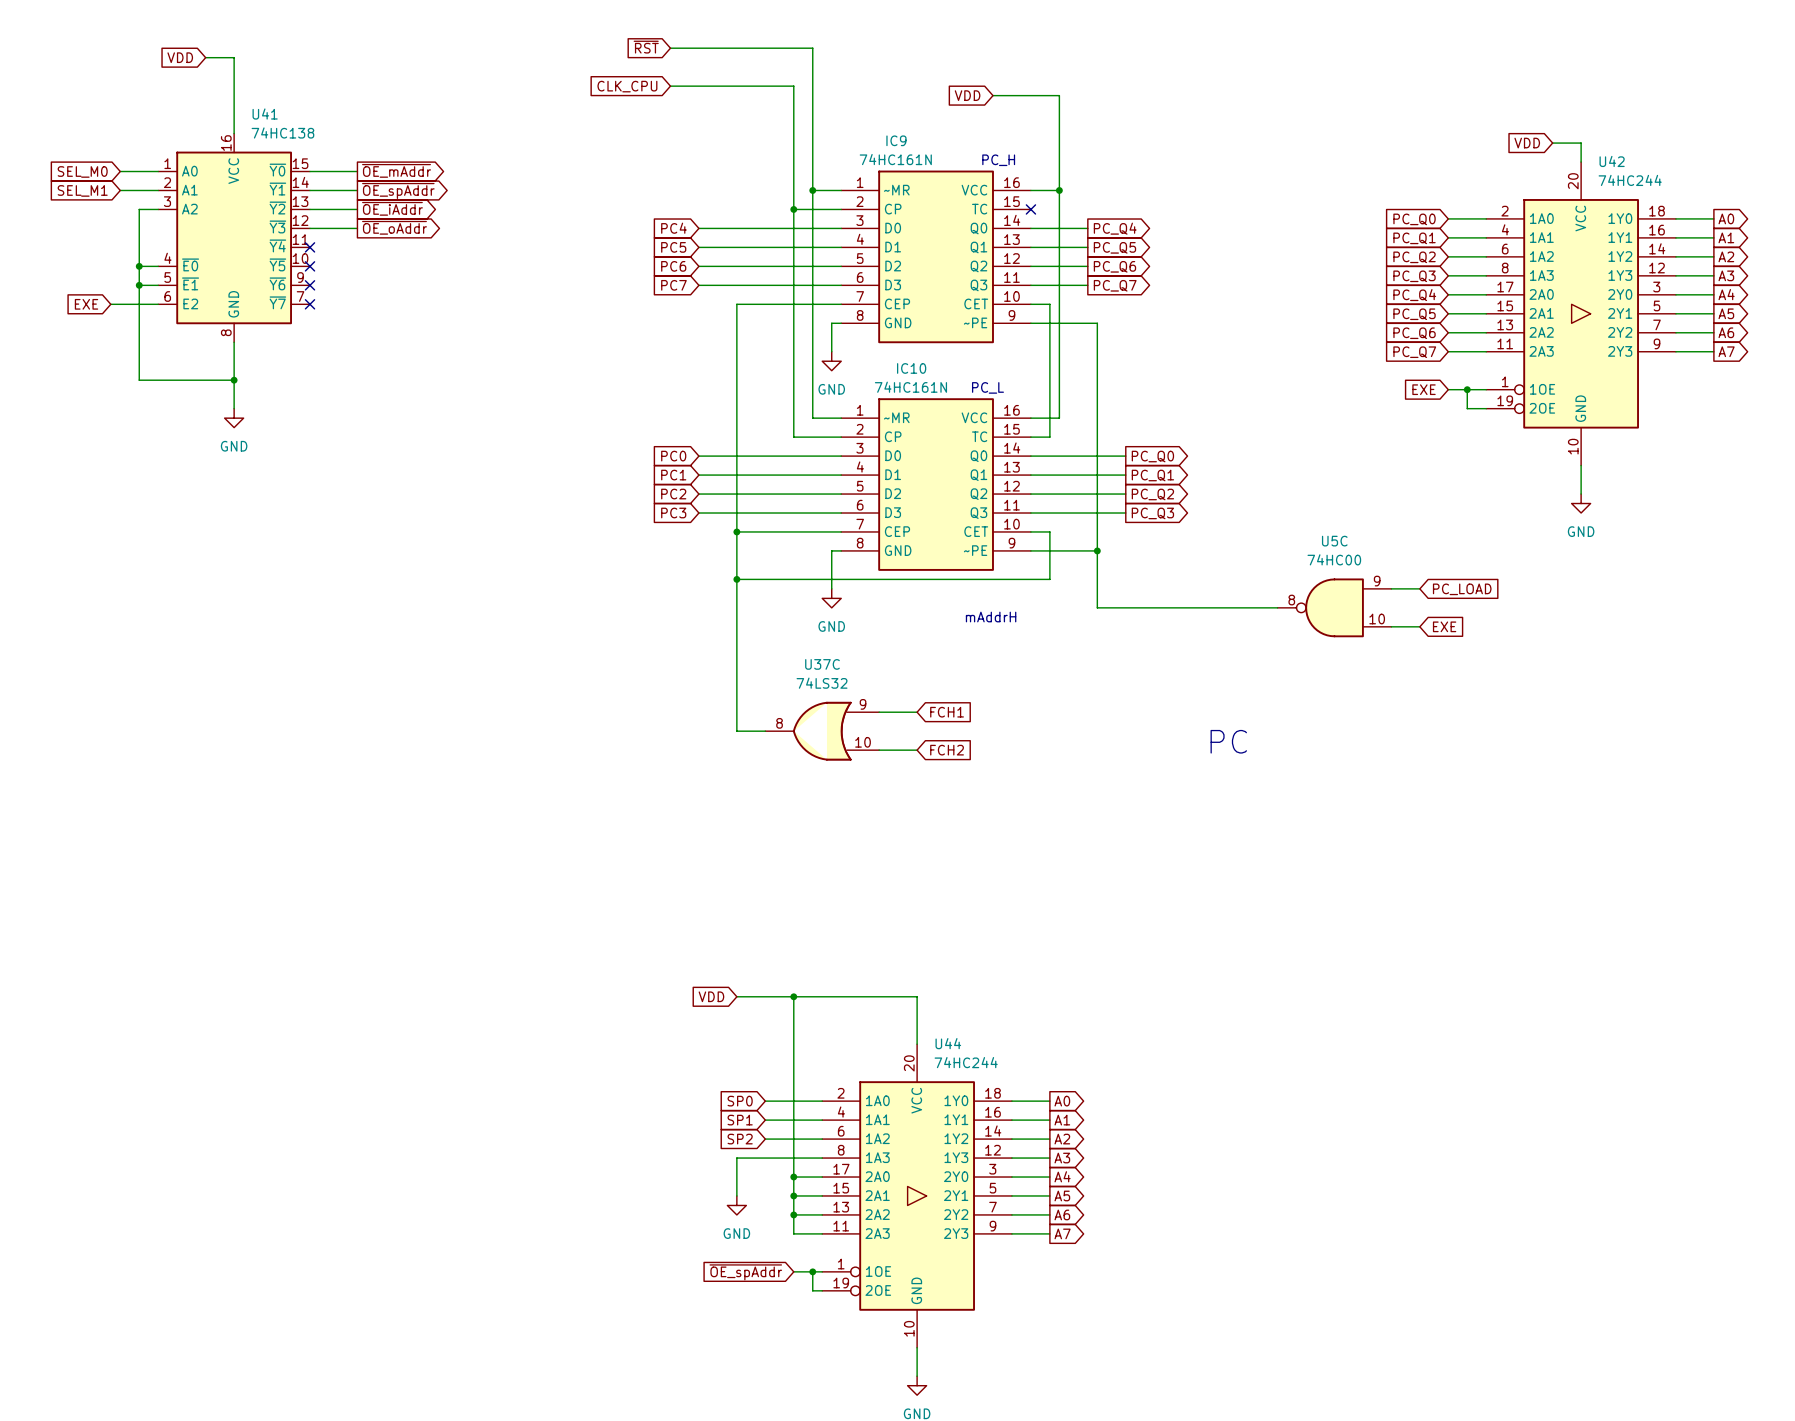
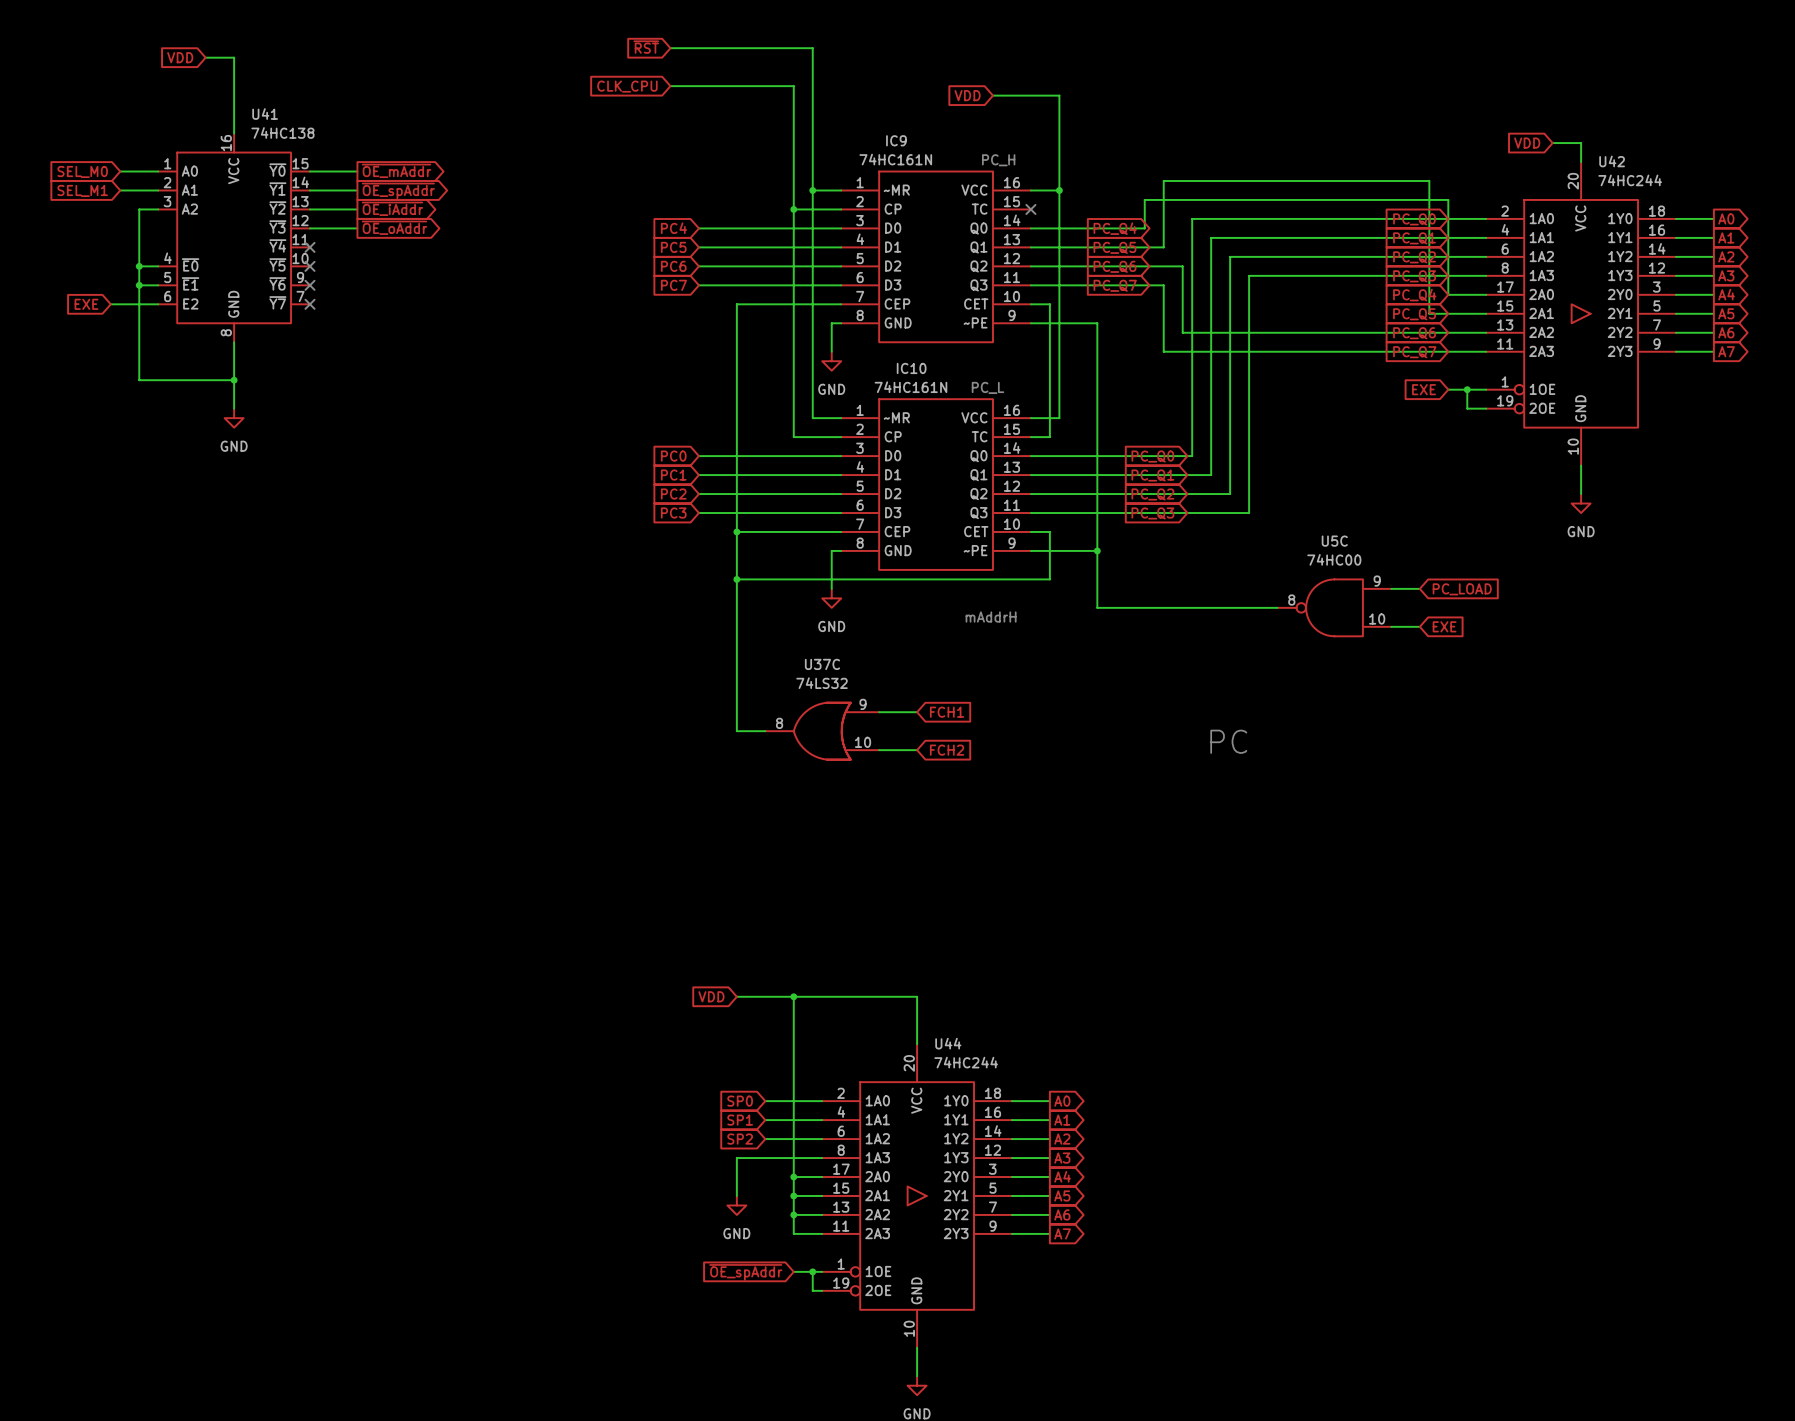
wire: none -> (1448, 218) (1192, 218) (1192, 456) (1125, 456)
wire: none -> (1087, 228) (1144, 228) (1144, 199) (1448, 199) (1448, 294)
wire: none -> (1448, 237) (1211, 237) (1211, 475) (1125, 475)
wire: none -> (1087, 247) (1163, 247) (1163, 181) (1429, 181) (1429, 313) (1448, 313)
wire: none -> (1448, 256) (1230, 256) (1230, 494) (1125, 494)
wire: none -> (1087, 266) (1182, 266) (1182, 332) (1448, 332)
wire: none -> (1448, 275) (1249, 275) (1249, 513) (1125, 513)
wire: none -> (1087, 285) (1163, 285) (1163, 351) (1448, 351)

